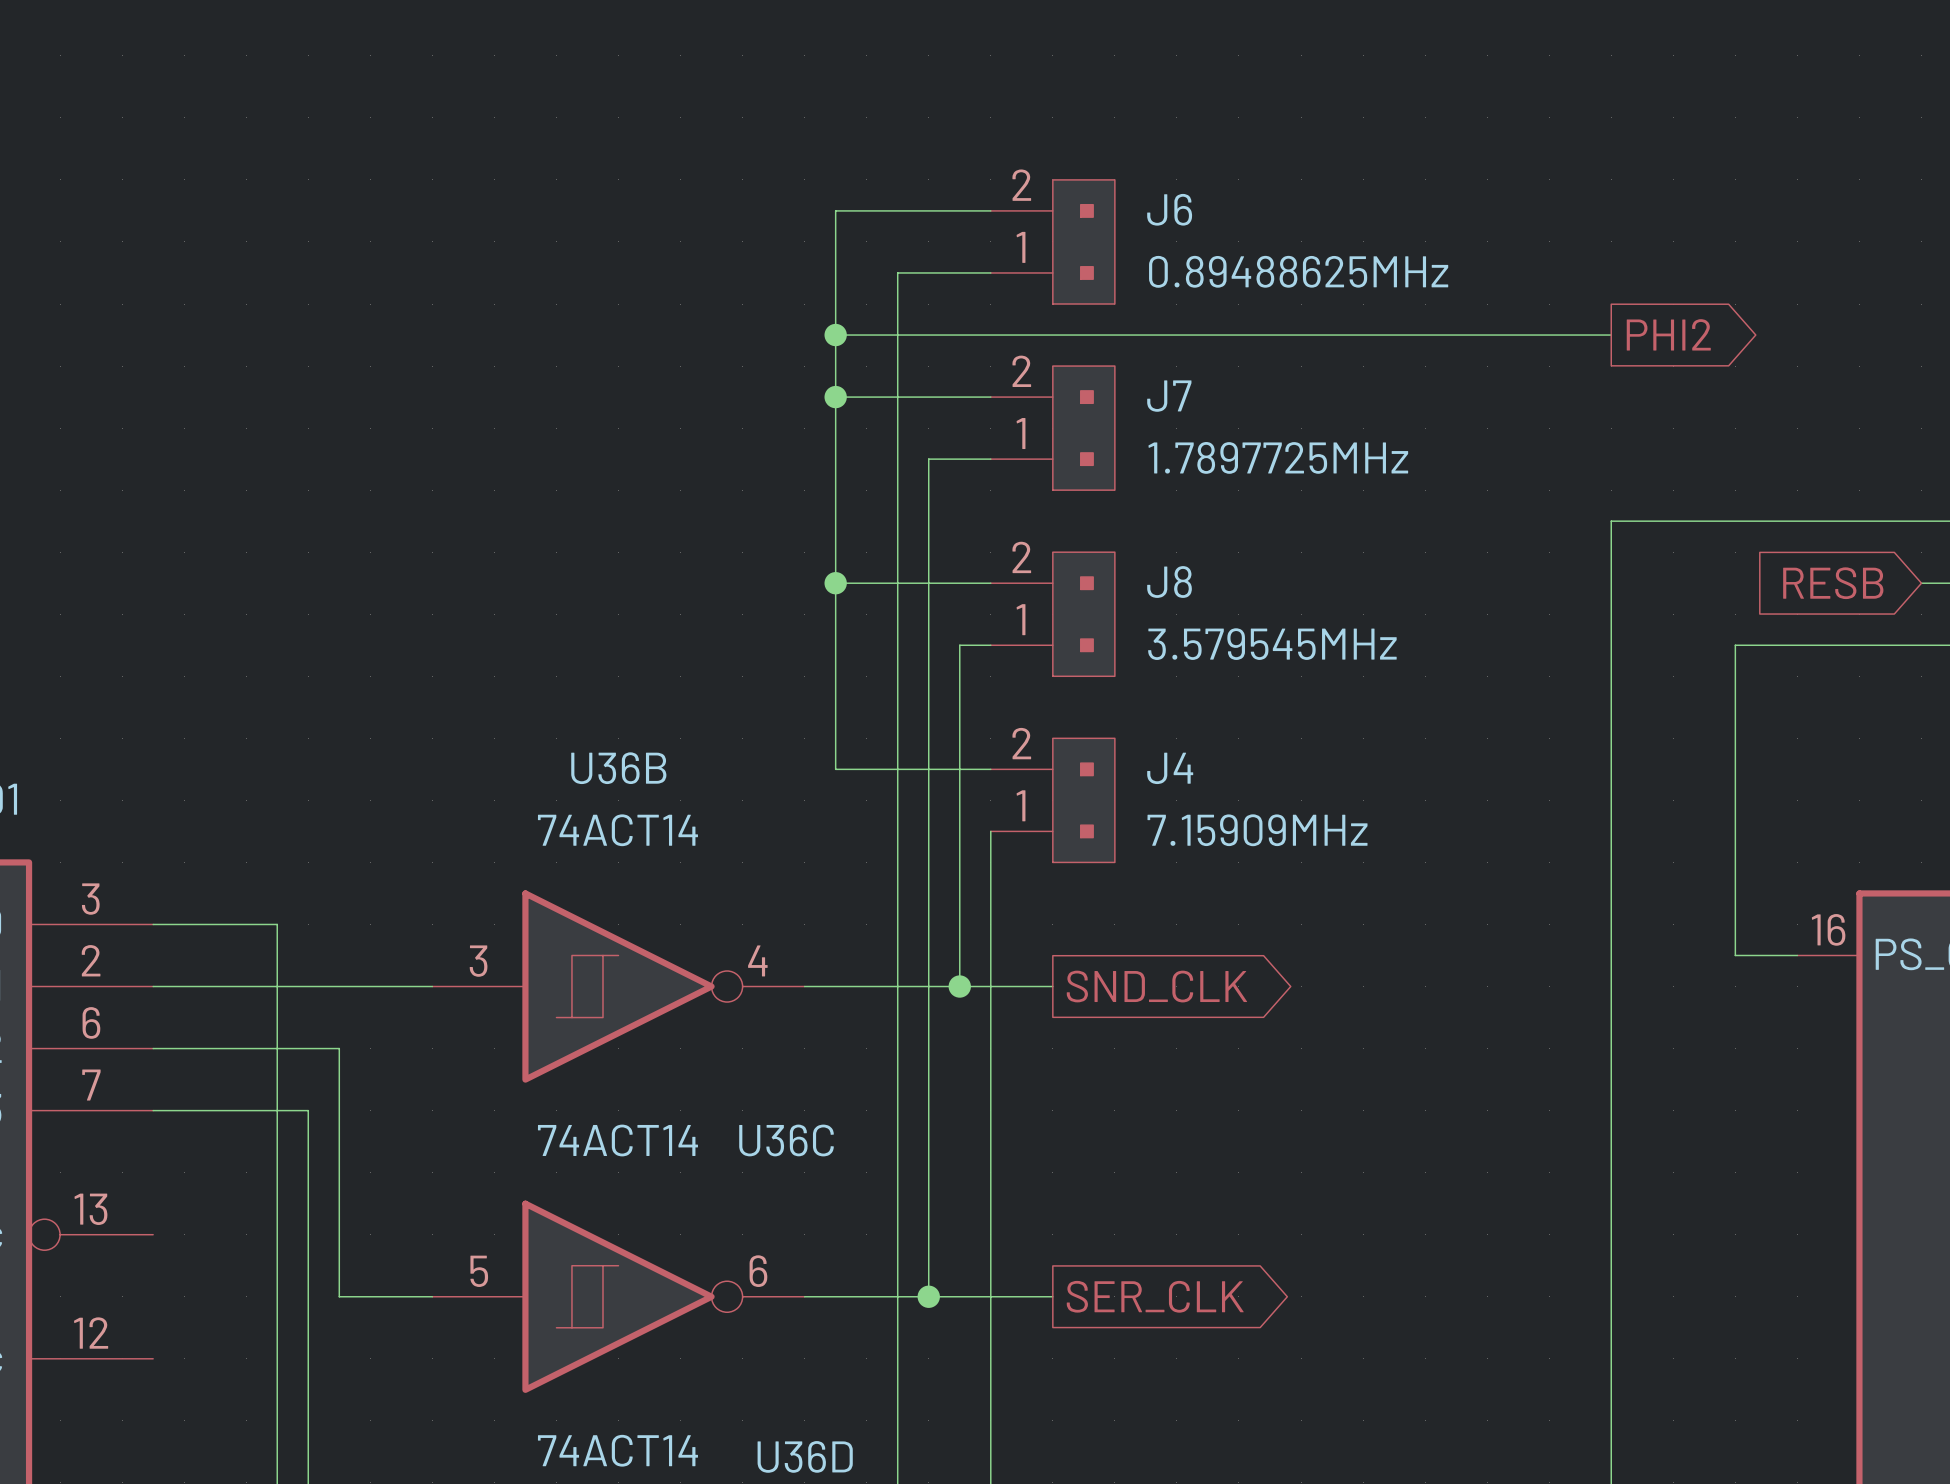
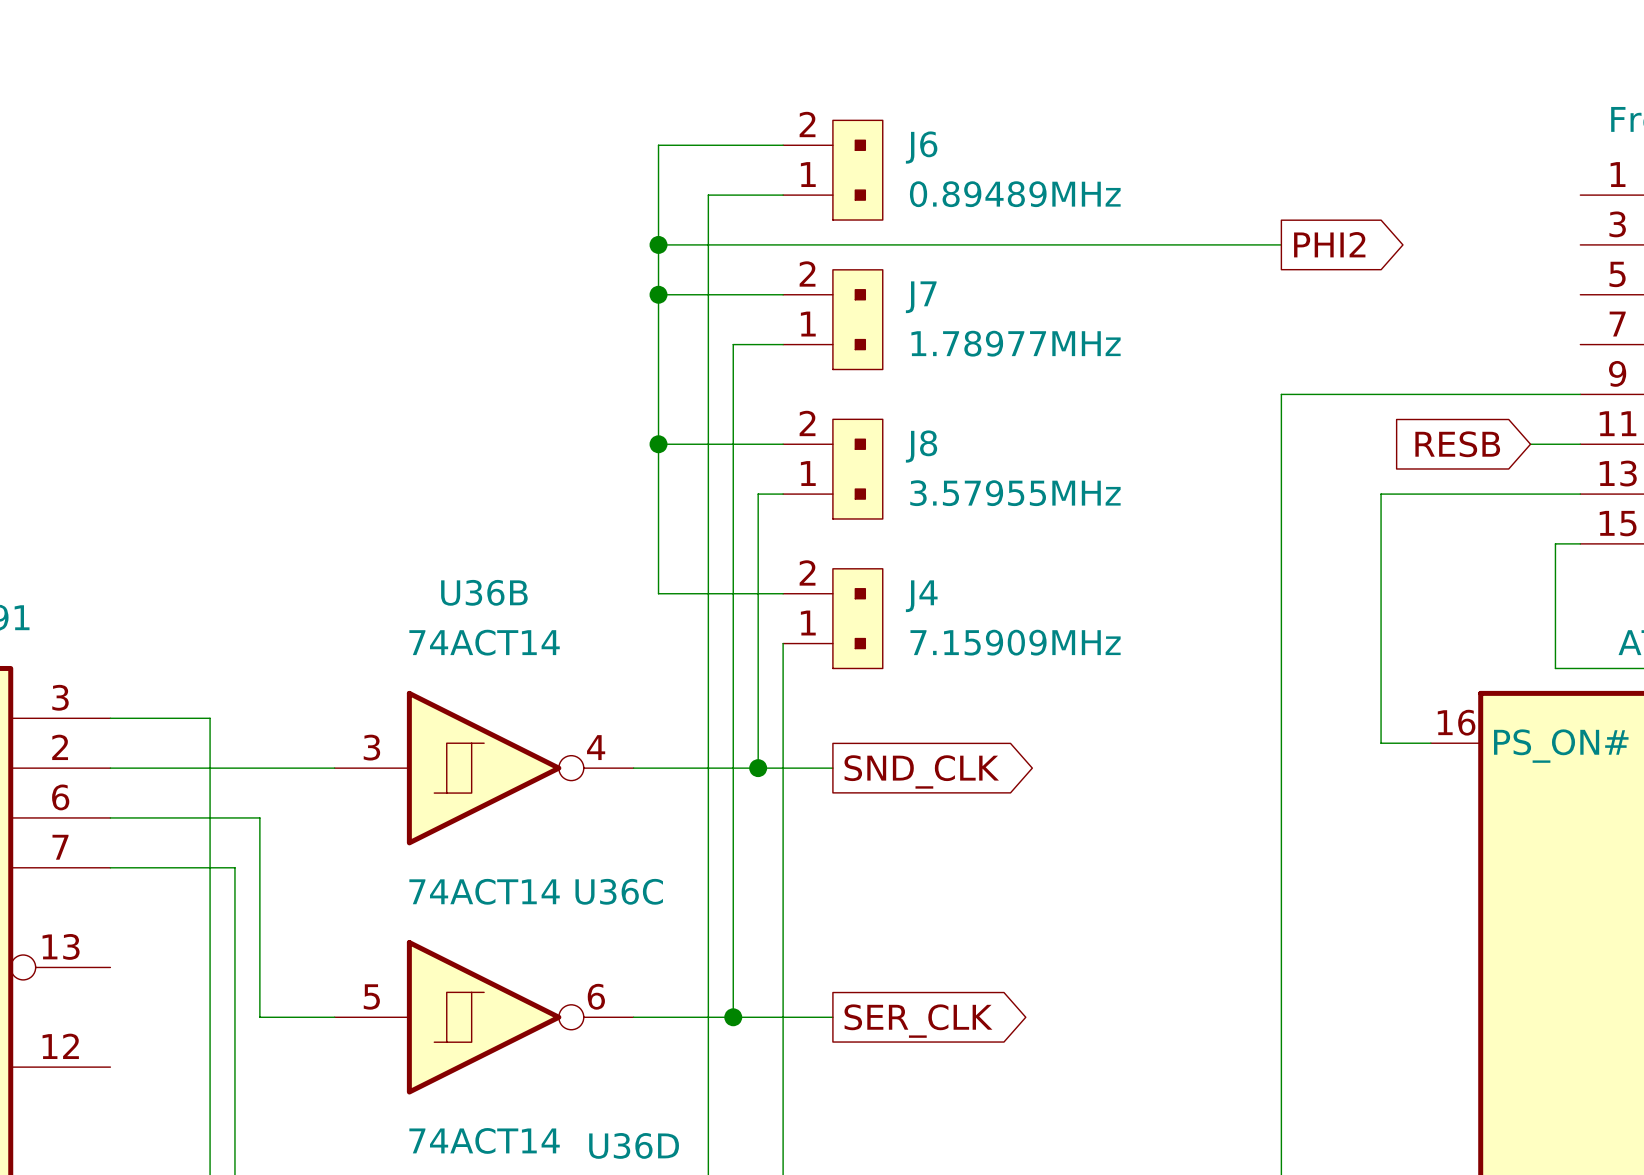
J6 value: 0.89488625MHz (1298, 271) -> 0.89489MHz (1015, 194)
J7 value: 1.7897725MHz (1278, 457) -> 1.78977MHz (1016, 343)
J8 value: 3.579545MHz (1272, 644) -> 3.57955MHz (1015, 493)

